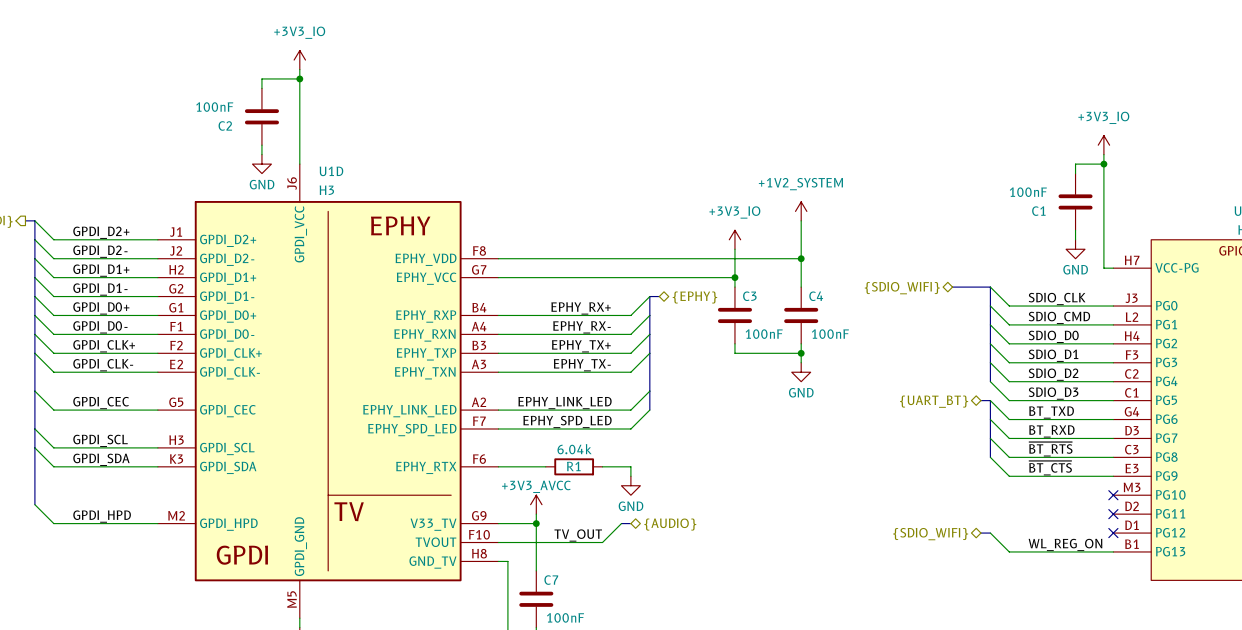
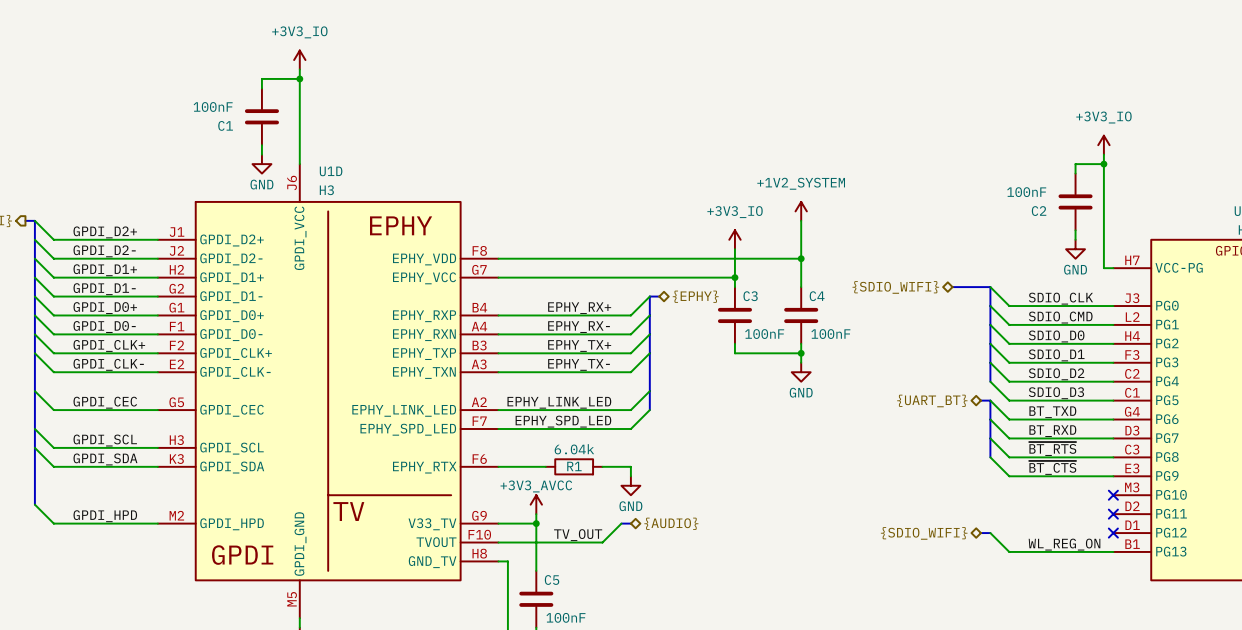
C2 name: C2 (225, 125) -> C1 (225, 125)
C1 name: C1 (1038, 211) -> C2 (1039, 211)
C7 name: C7 (551, 580) -> C5 (552, 580)

